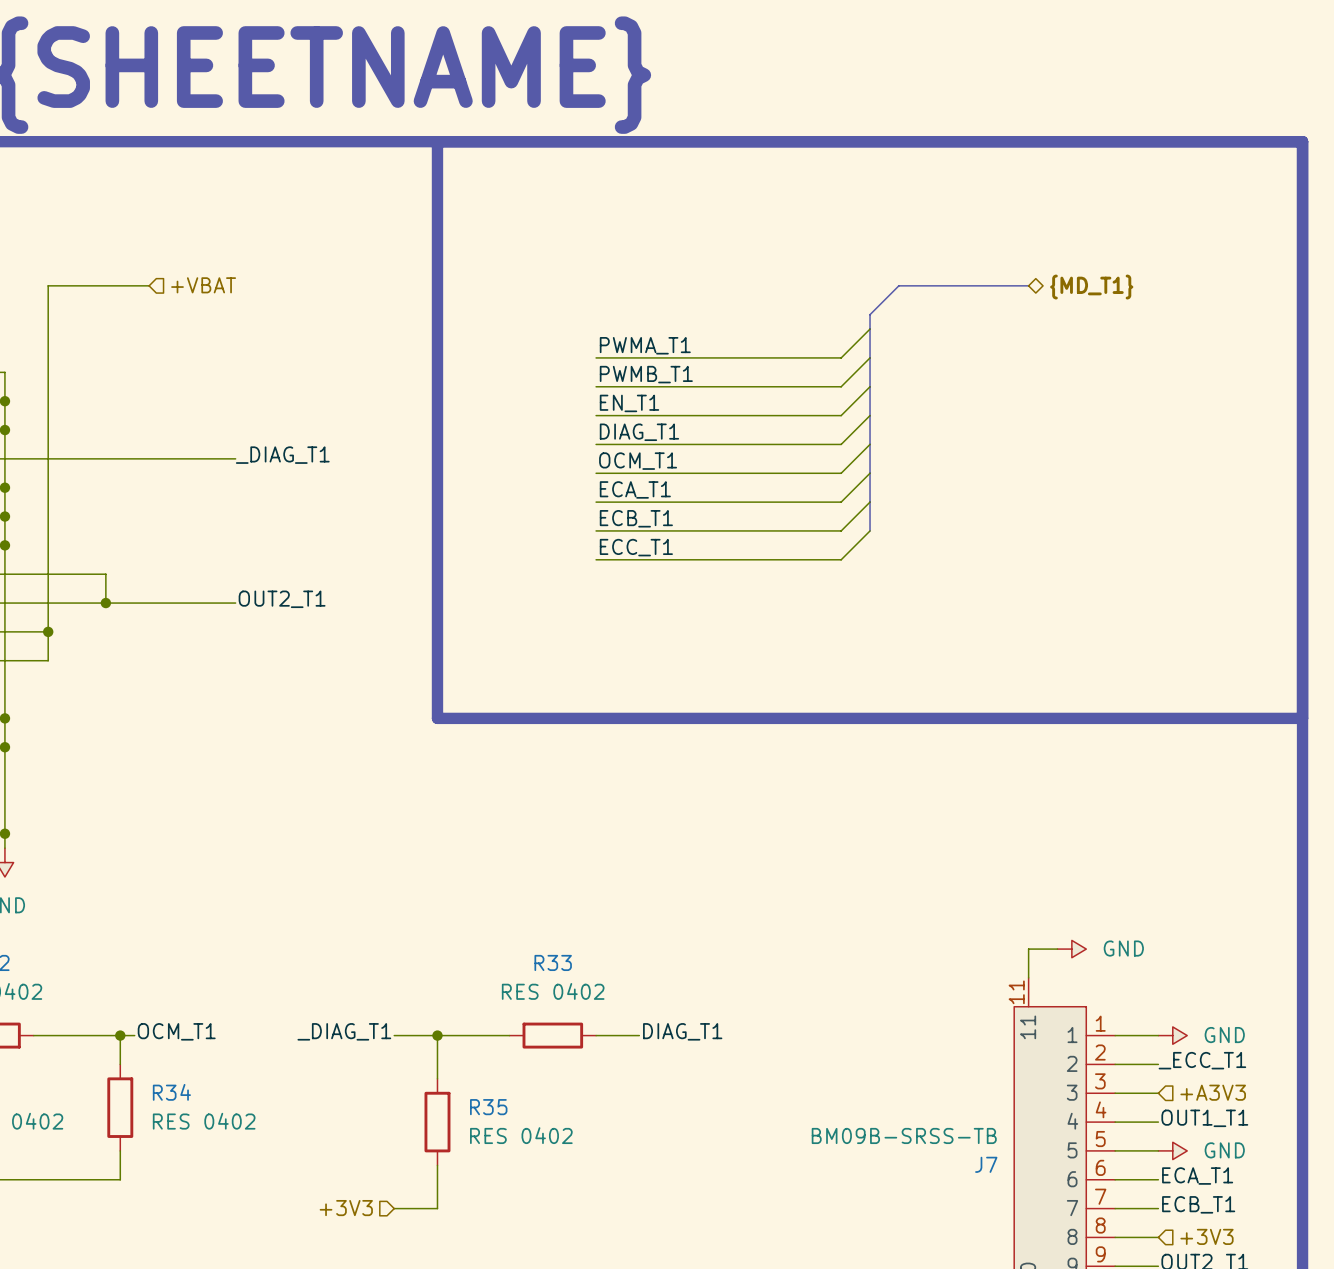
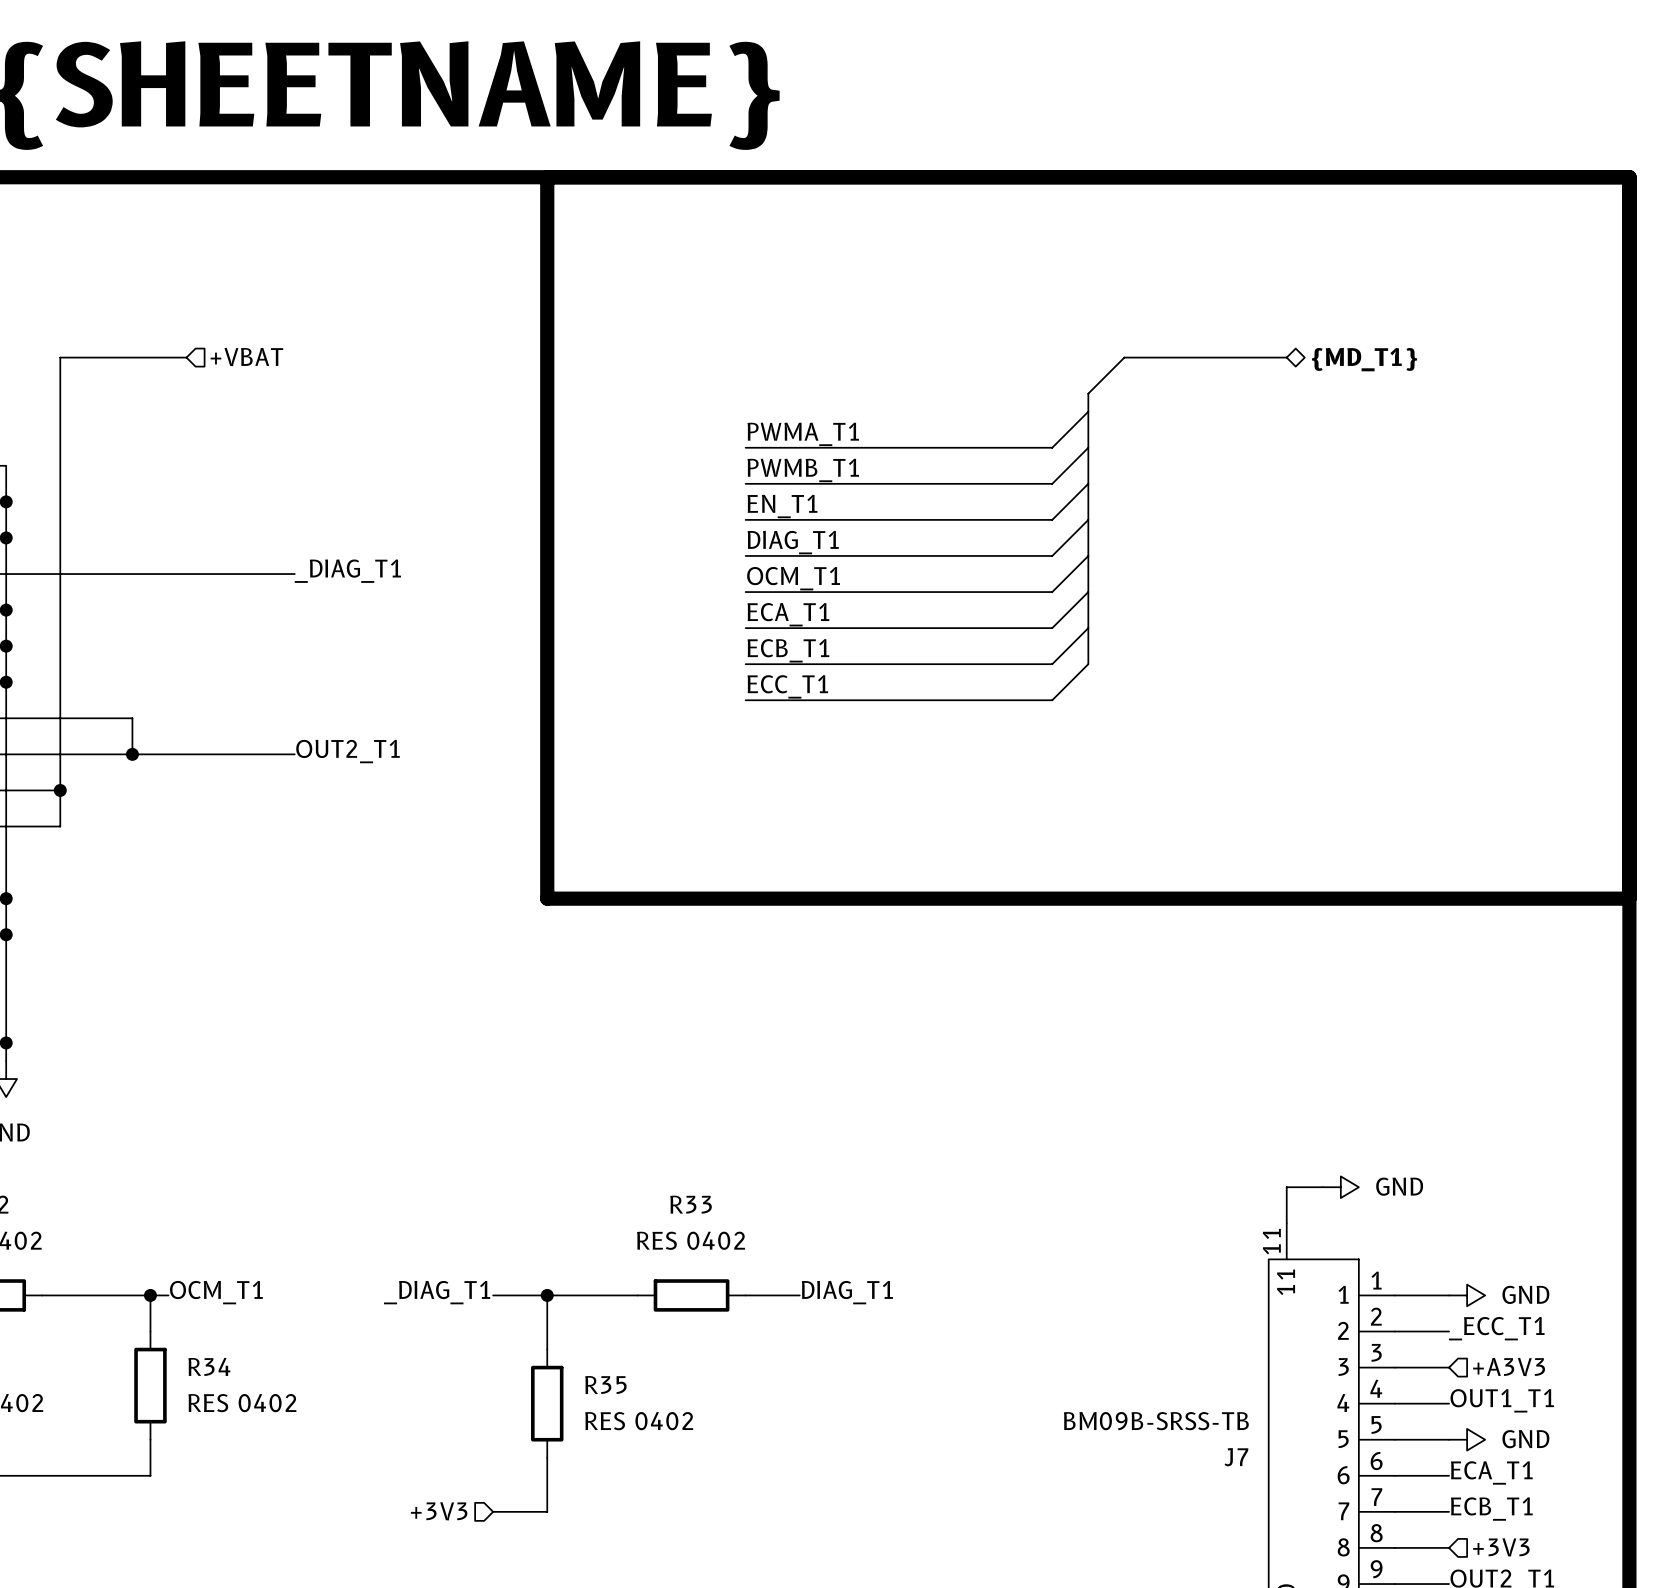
power symbol text position: GND (1123, 948) -> GND (1399, 1186)
power symbol text position: GND (1224, 1035) -> GND (1525, 1294)
power symbol text position: GND (1224, 1150) -> GND (1525, 1439)

